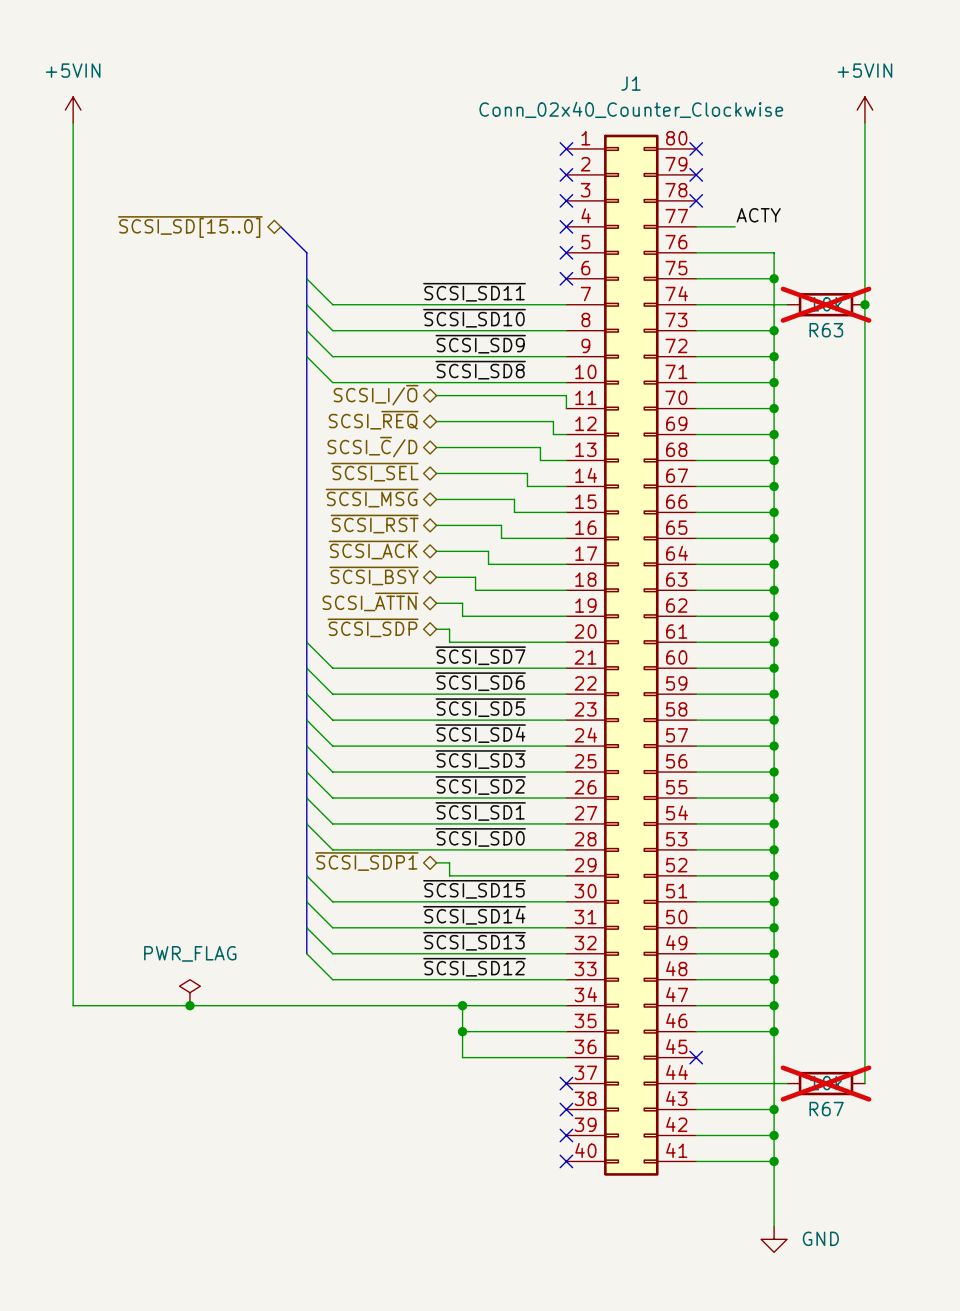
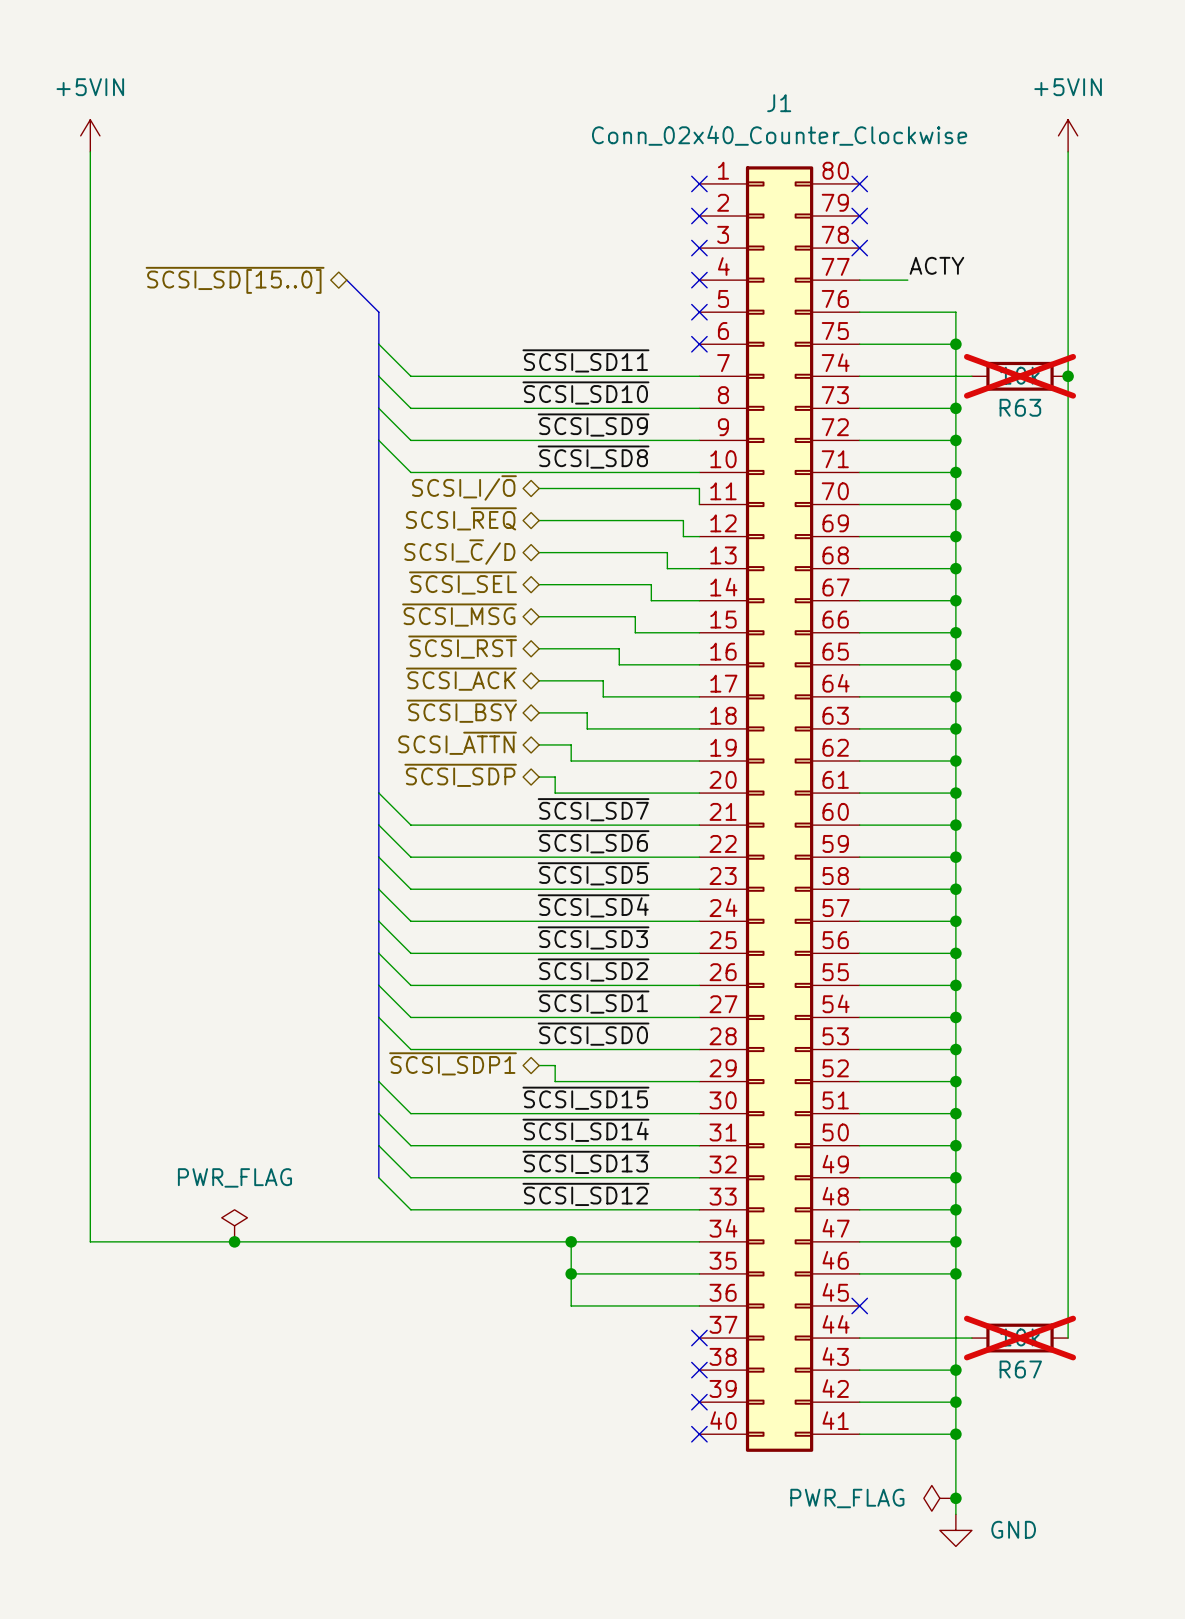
power symbol: none -> PWR_FLAG (939, 1498)
junction: none -> (955, 1498)

